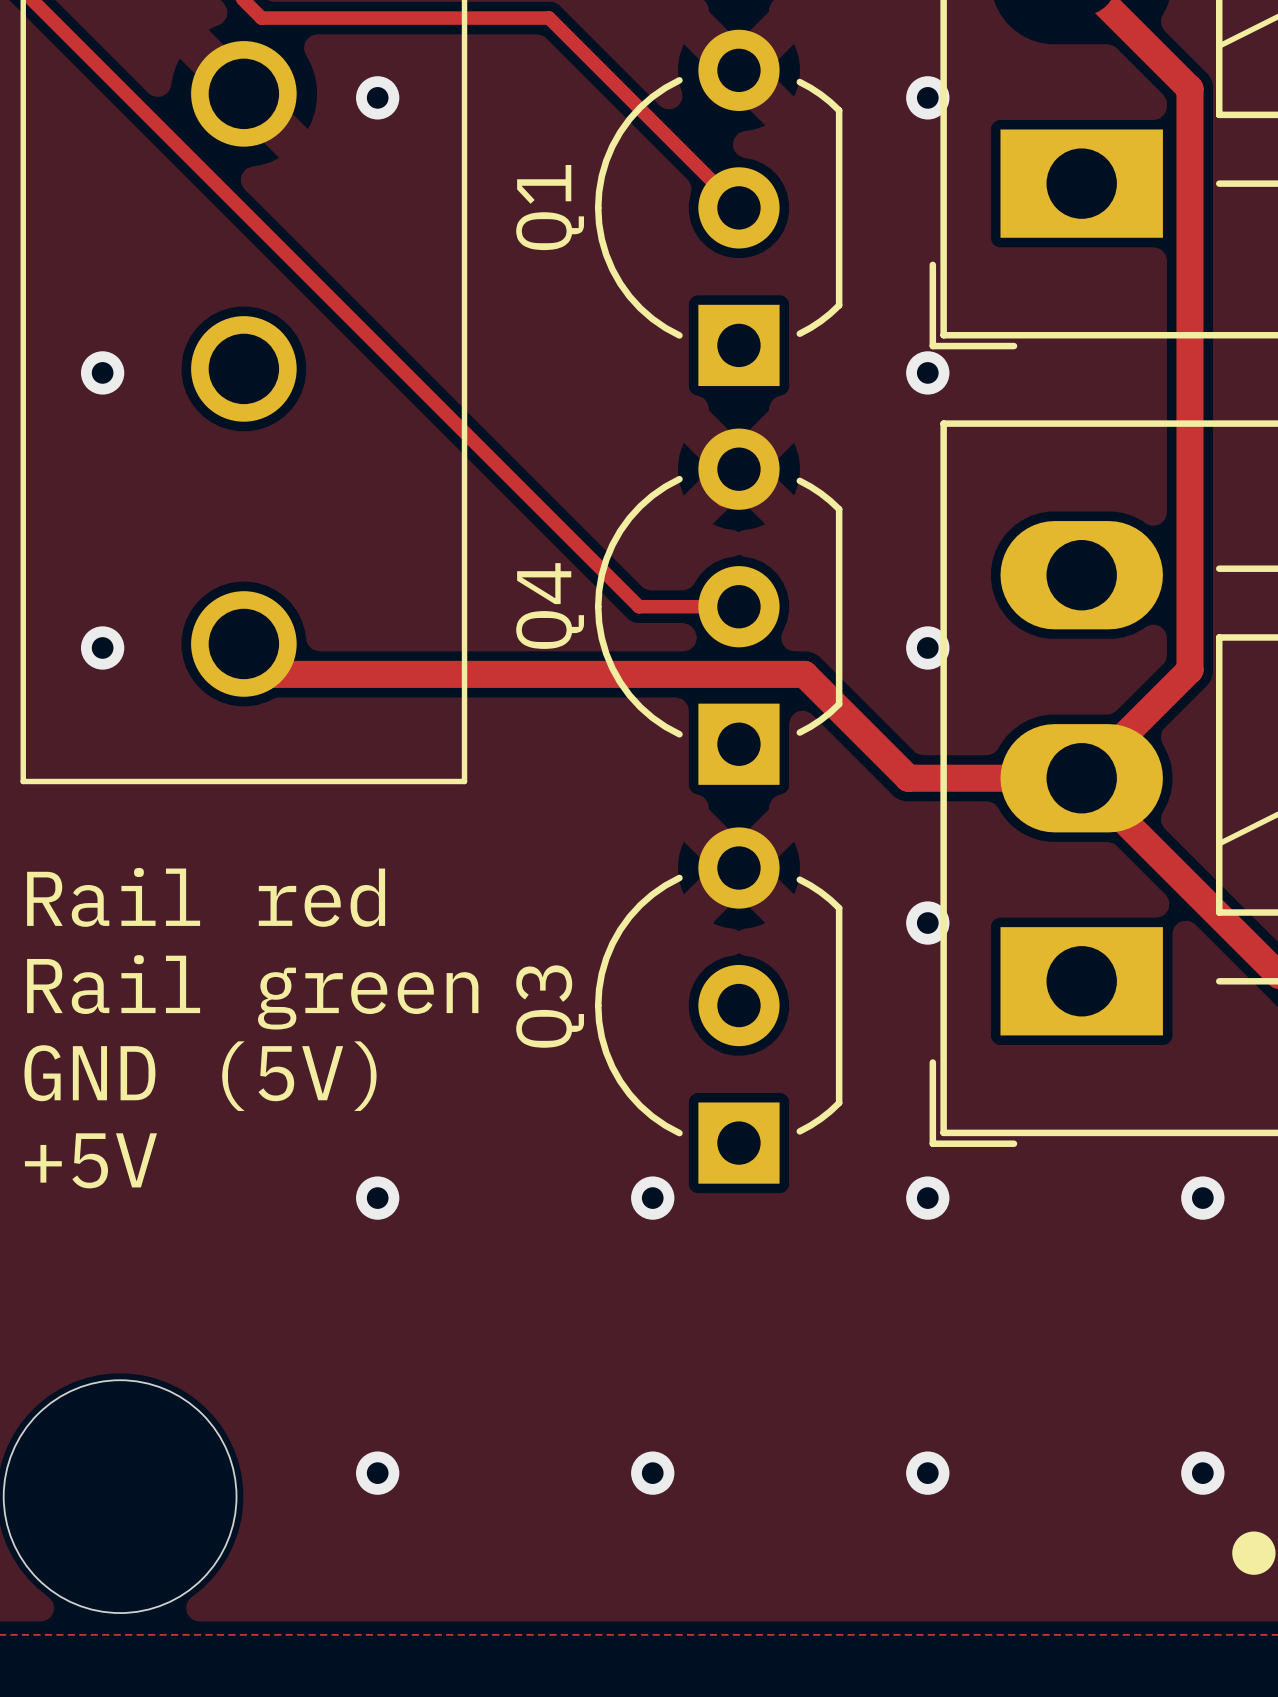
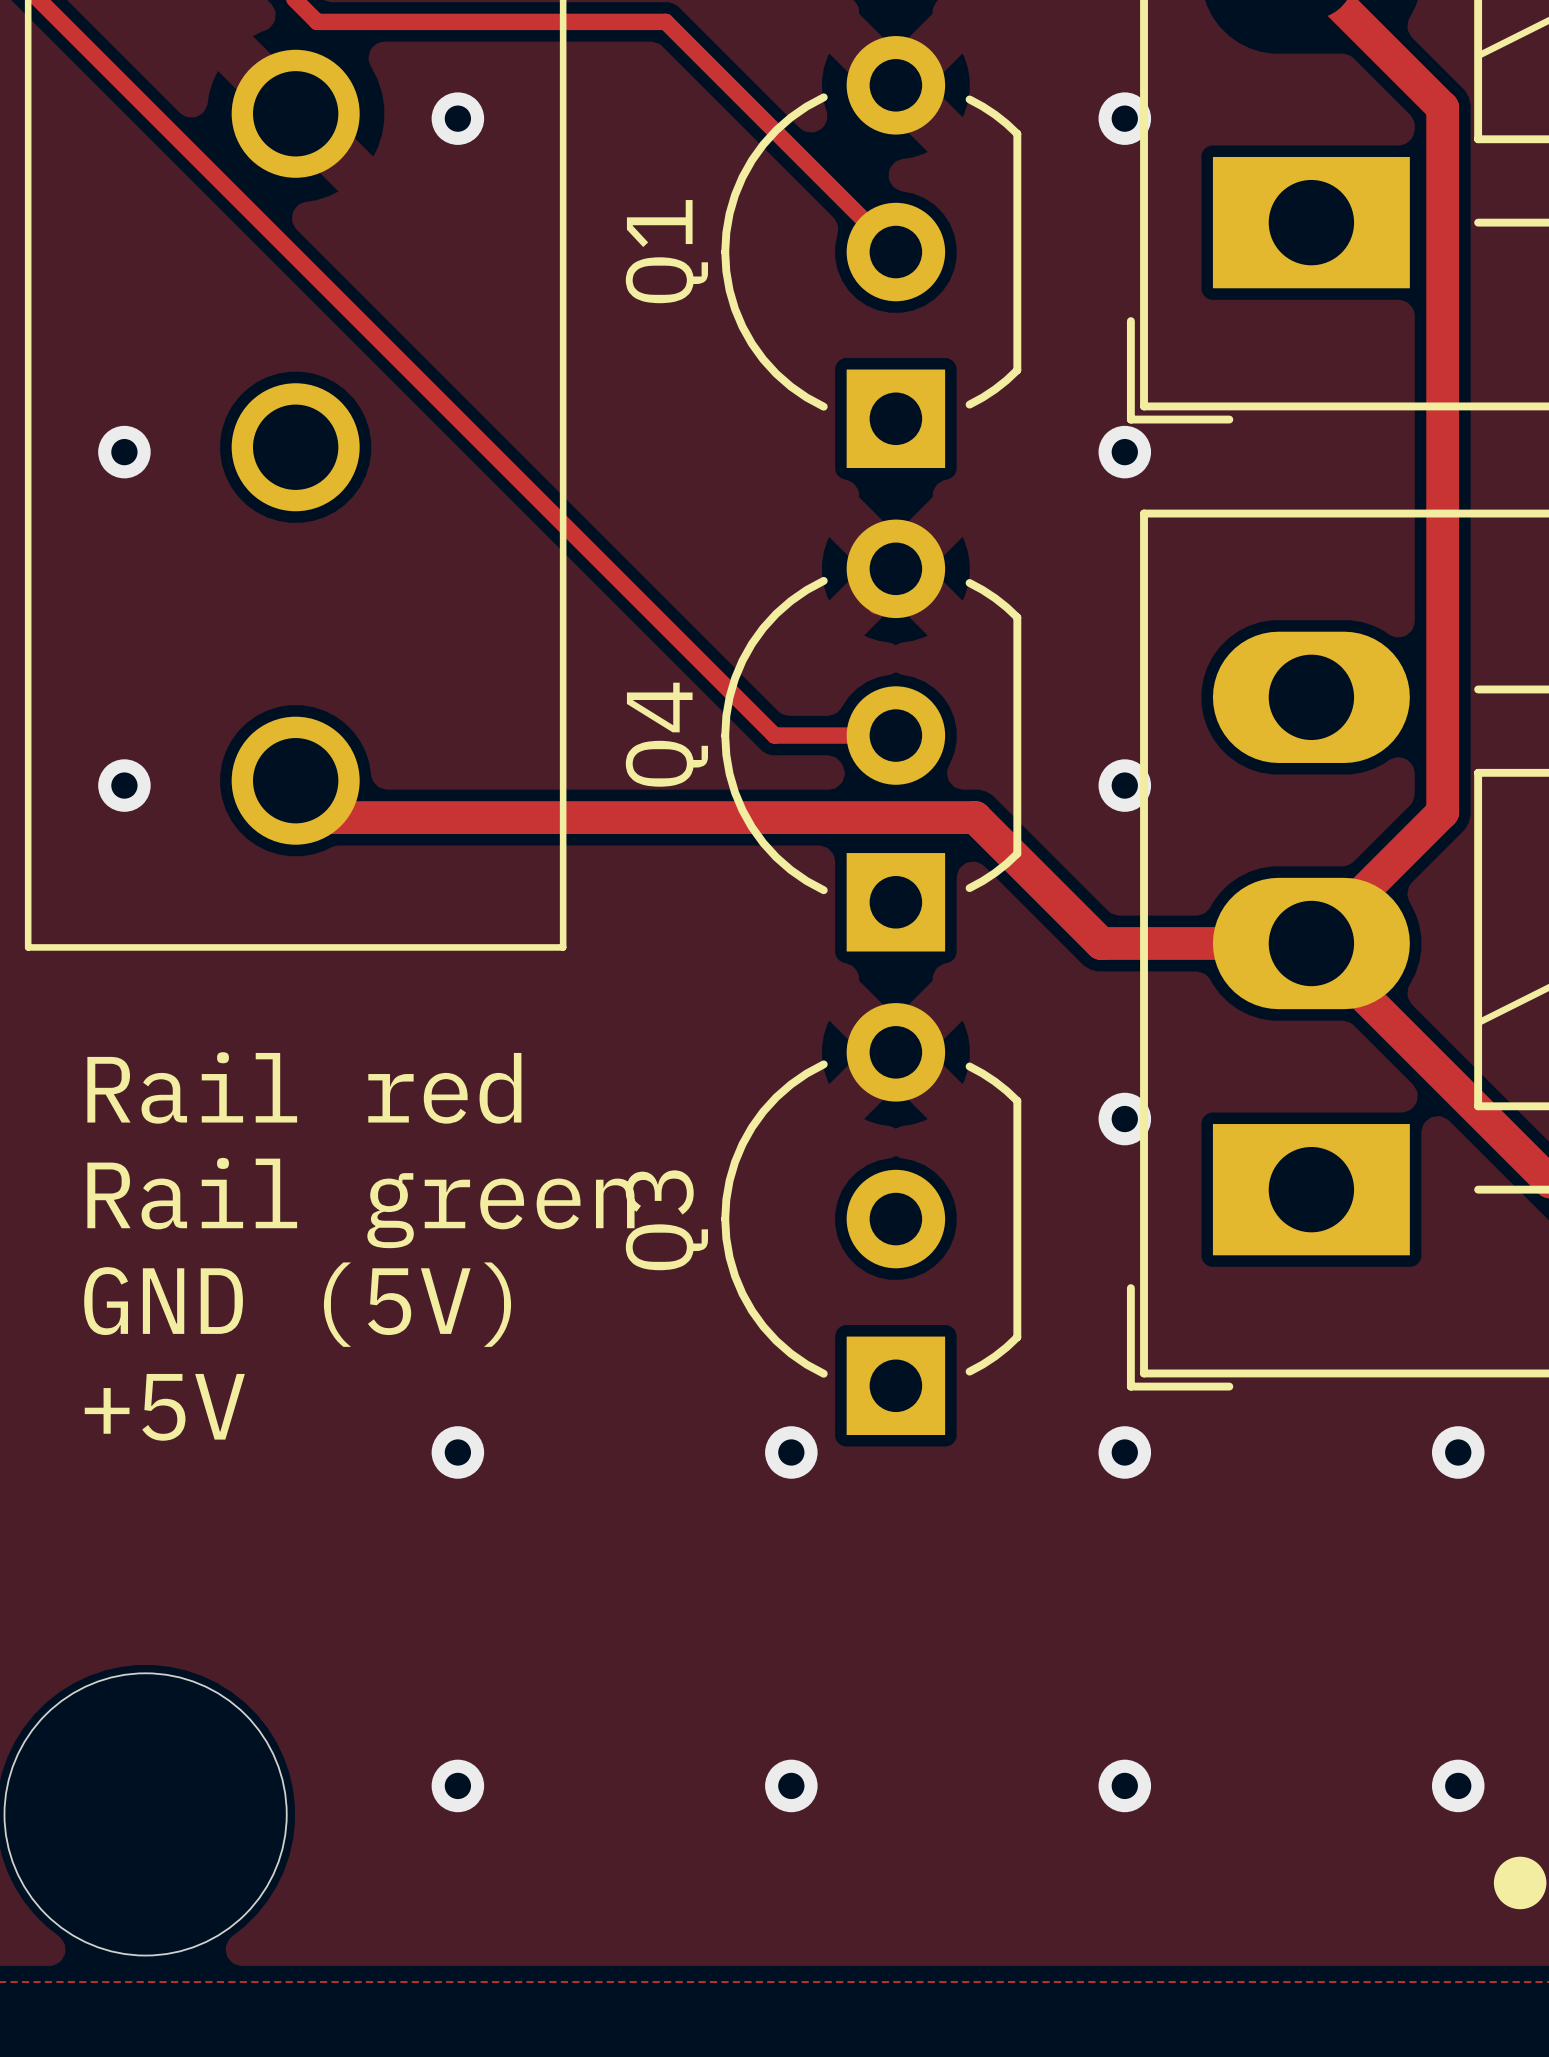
text position: Rail red (206, 897) -> Rail red (304, 1087)
text position: Rail green (252, 992) -> Rail green (360, 1203)
text position: GND (5V) (200, 1076) -> GND (5V) (297, 1304)
text position: +5V (90, 1160) -> +5V (164, 1407)

